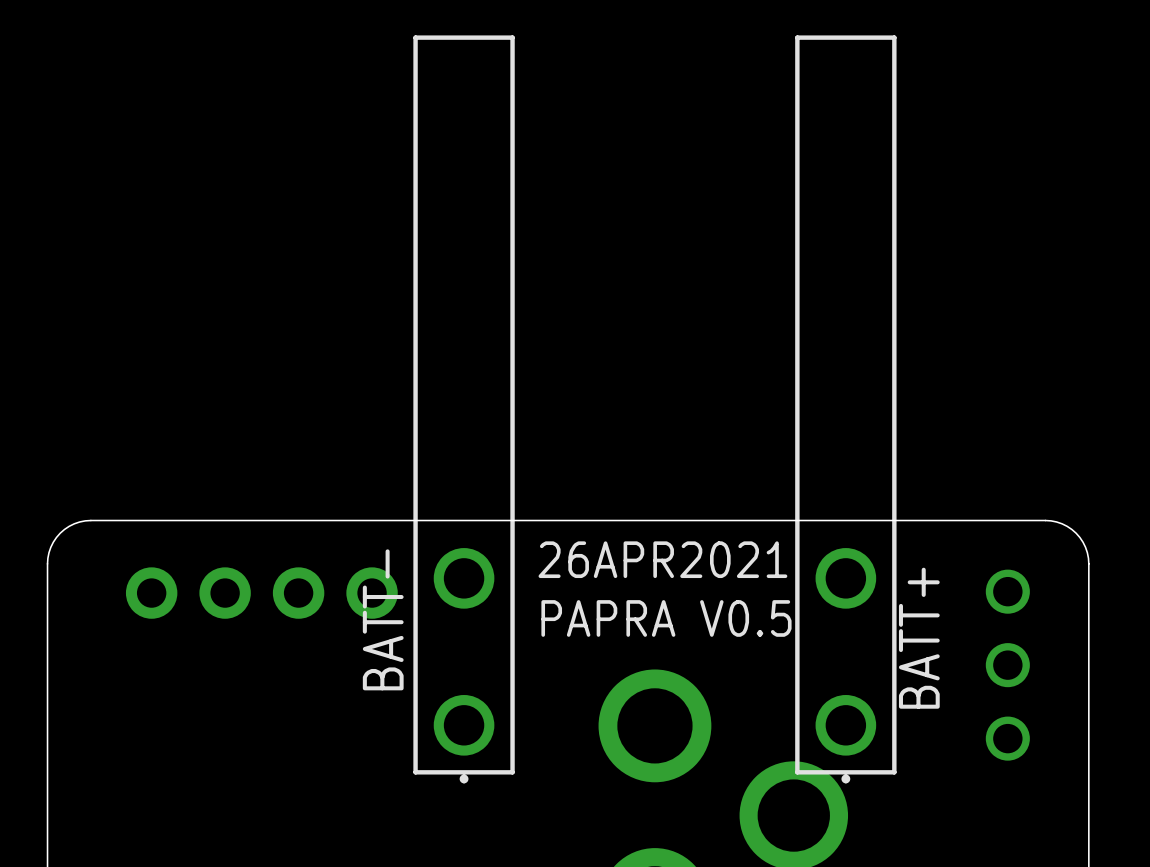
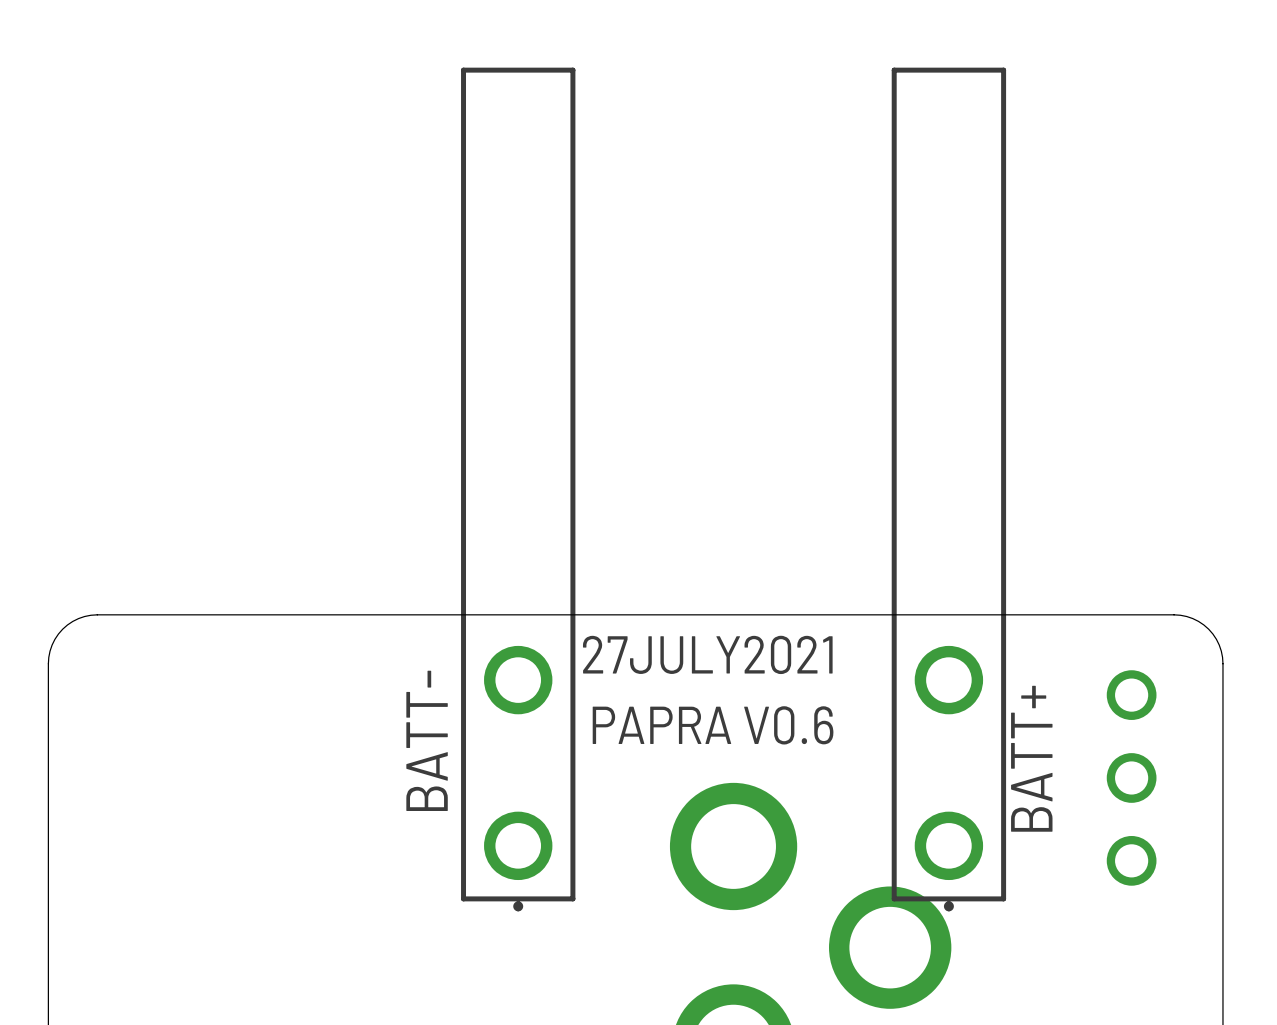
text: 26APR2021 (662, 559) -> 27JULY2021 (707, 654)
part: (261, 593) -> none
text: PAPRA V0.5 (666, 618) -> PAPRA V0.6 (713, 725)

